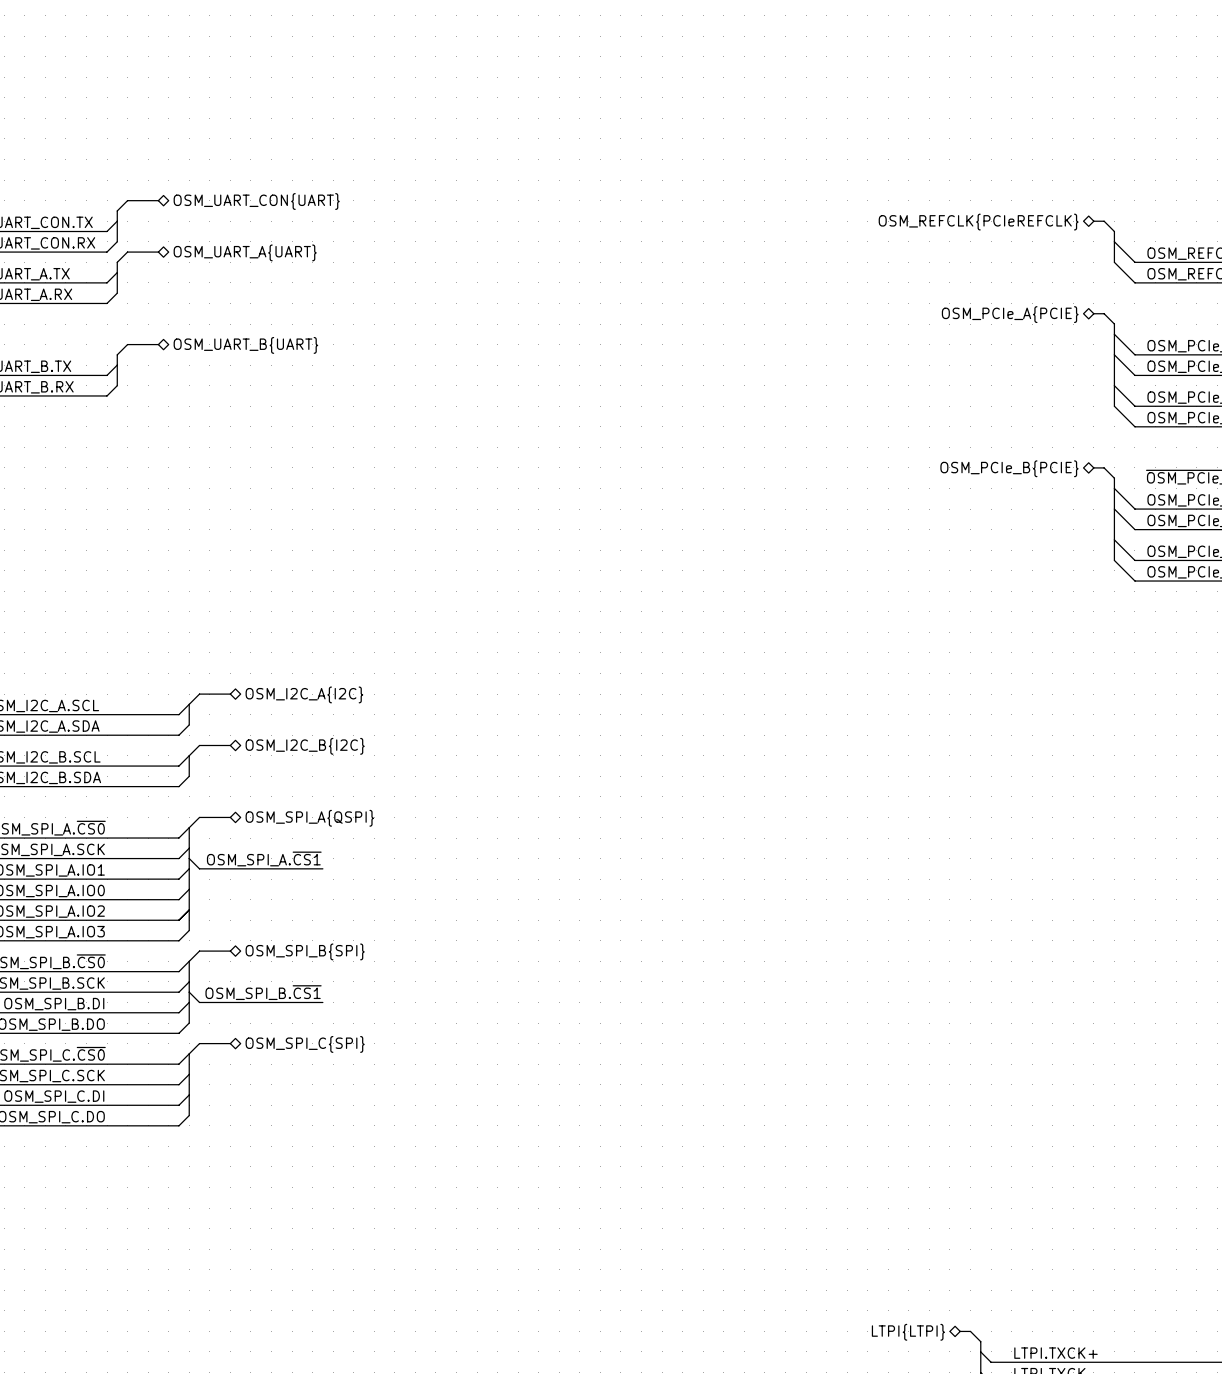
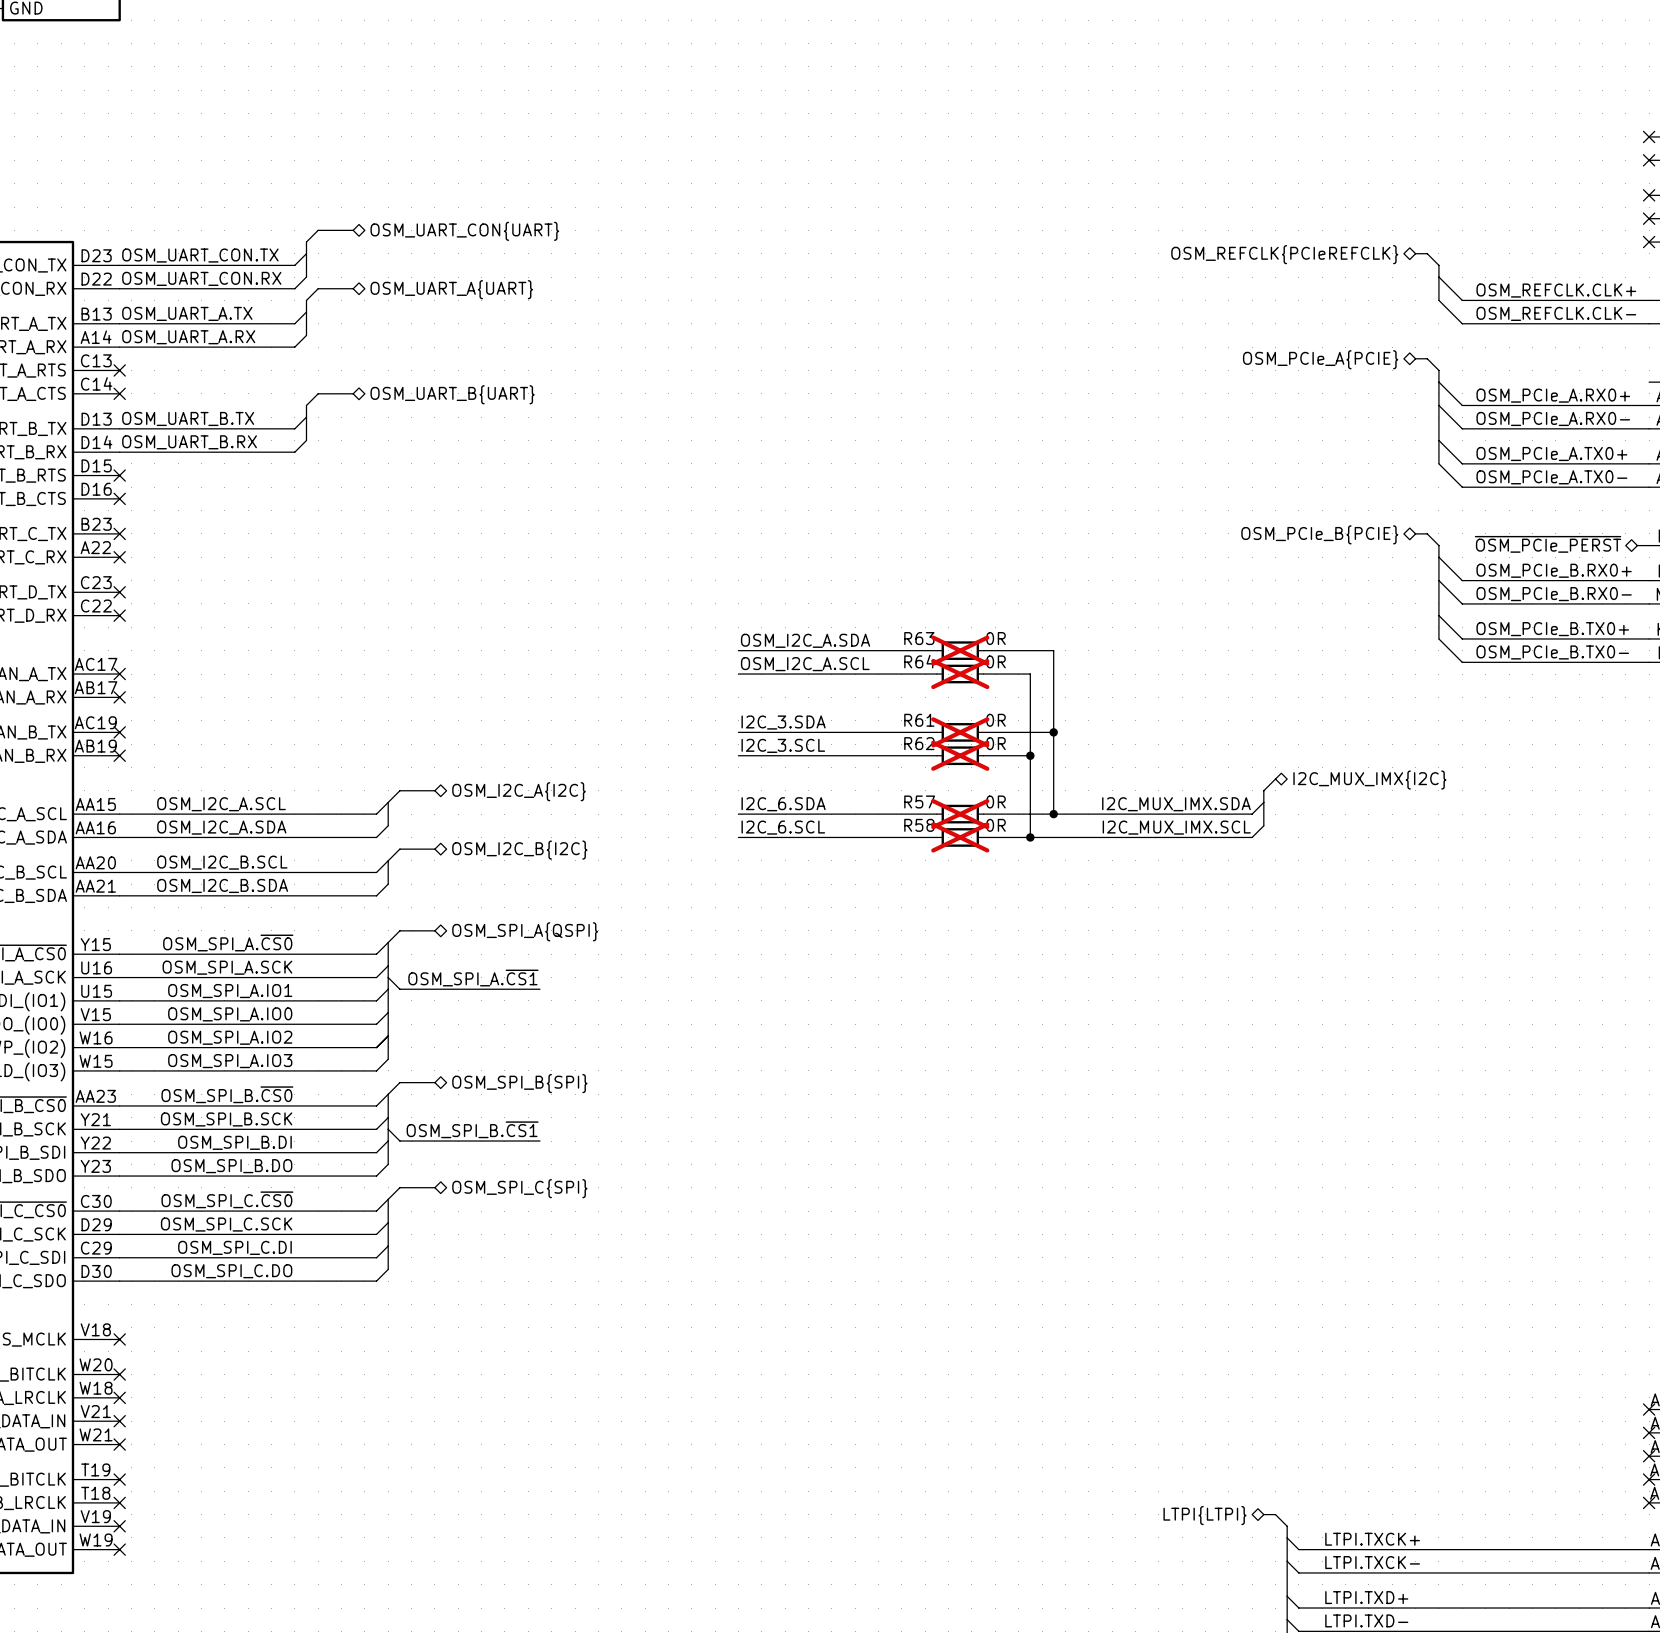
label: none -> OSM_I2C_A.SDA (805, 640)
wire: none -> (738, 650) (936, 650)
R63: none -> (960, 650)
wire: none -> (983, 650) (1053, 650) (1053, 814)
label: none -> OSM_I2C_A.SCL (805, 664)
wire: none -> (738, 674) (936, 674)
R64: none -> (960, 674)
wire: none -> (983, 674) (1030, 674) (1030, 837)
label: none -> I2C_3.SDA (783, 722)
wire: none -> (738, 732) (936, 732)
R61: none -> (960, 732)
wire: none -> (983, 732) (1053, 732)
junction: none -> (1053, 732)
label: none -> I2C_3.SCL (783, 745)
wire: none -> (738, 755) (936, 755)
R62: none -> (960, 755)
wire: none -> (983, 755) (1030, 755)
junction: none -> (1030, 755)
bus: none -> (1275, 779) (1263, 790) (1263, 825)
hierarchical label: none -> I2C_MUX_IMX{I2C} (1369, 780)
wire: none -> (1263, 802) (1252, 814) (983, 814)
label: none -> I2C_6.SDA (783, 804)
label: none -> I2C_MUX_IMX.SDA (1176, 804)
wire: none -> (738, 814) (936, 814)
R57: none -> (960, 814)
junction: none -> (1053, 814)
wire: none -> (1263, 825) (1252, 837) (983, 837)
label: none -> I2C_6.SCL (783, 827)
label: none -> I2C_MUX_IMX.SCL (1176, 827)
wire: none -> (738, 837) (936, 837)
R58: none -> (960, 837)
junction: none -> (1030, 837)

